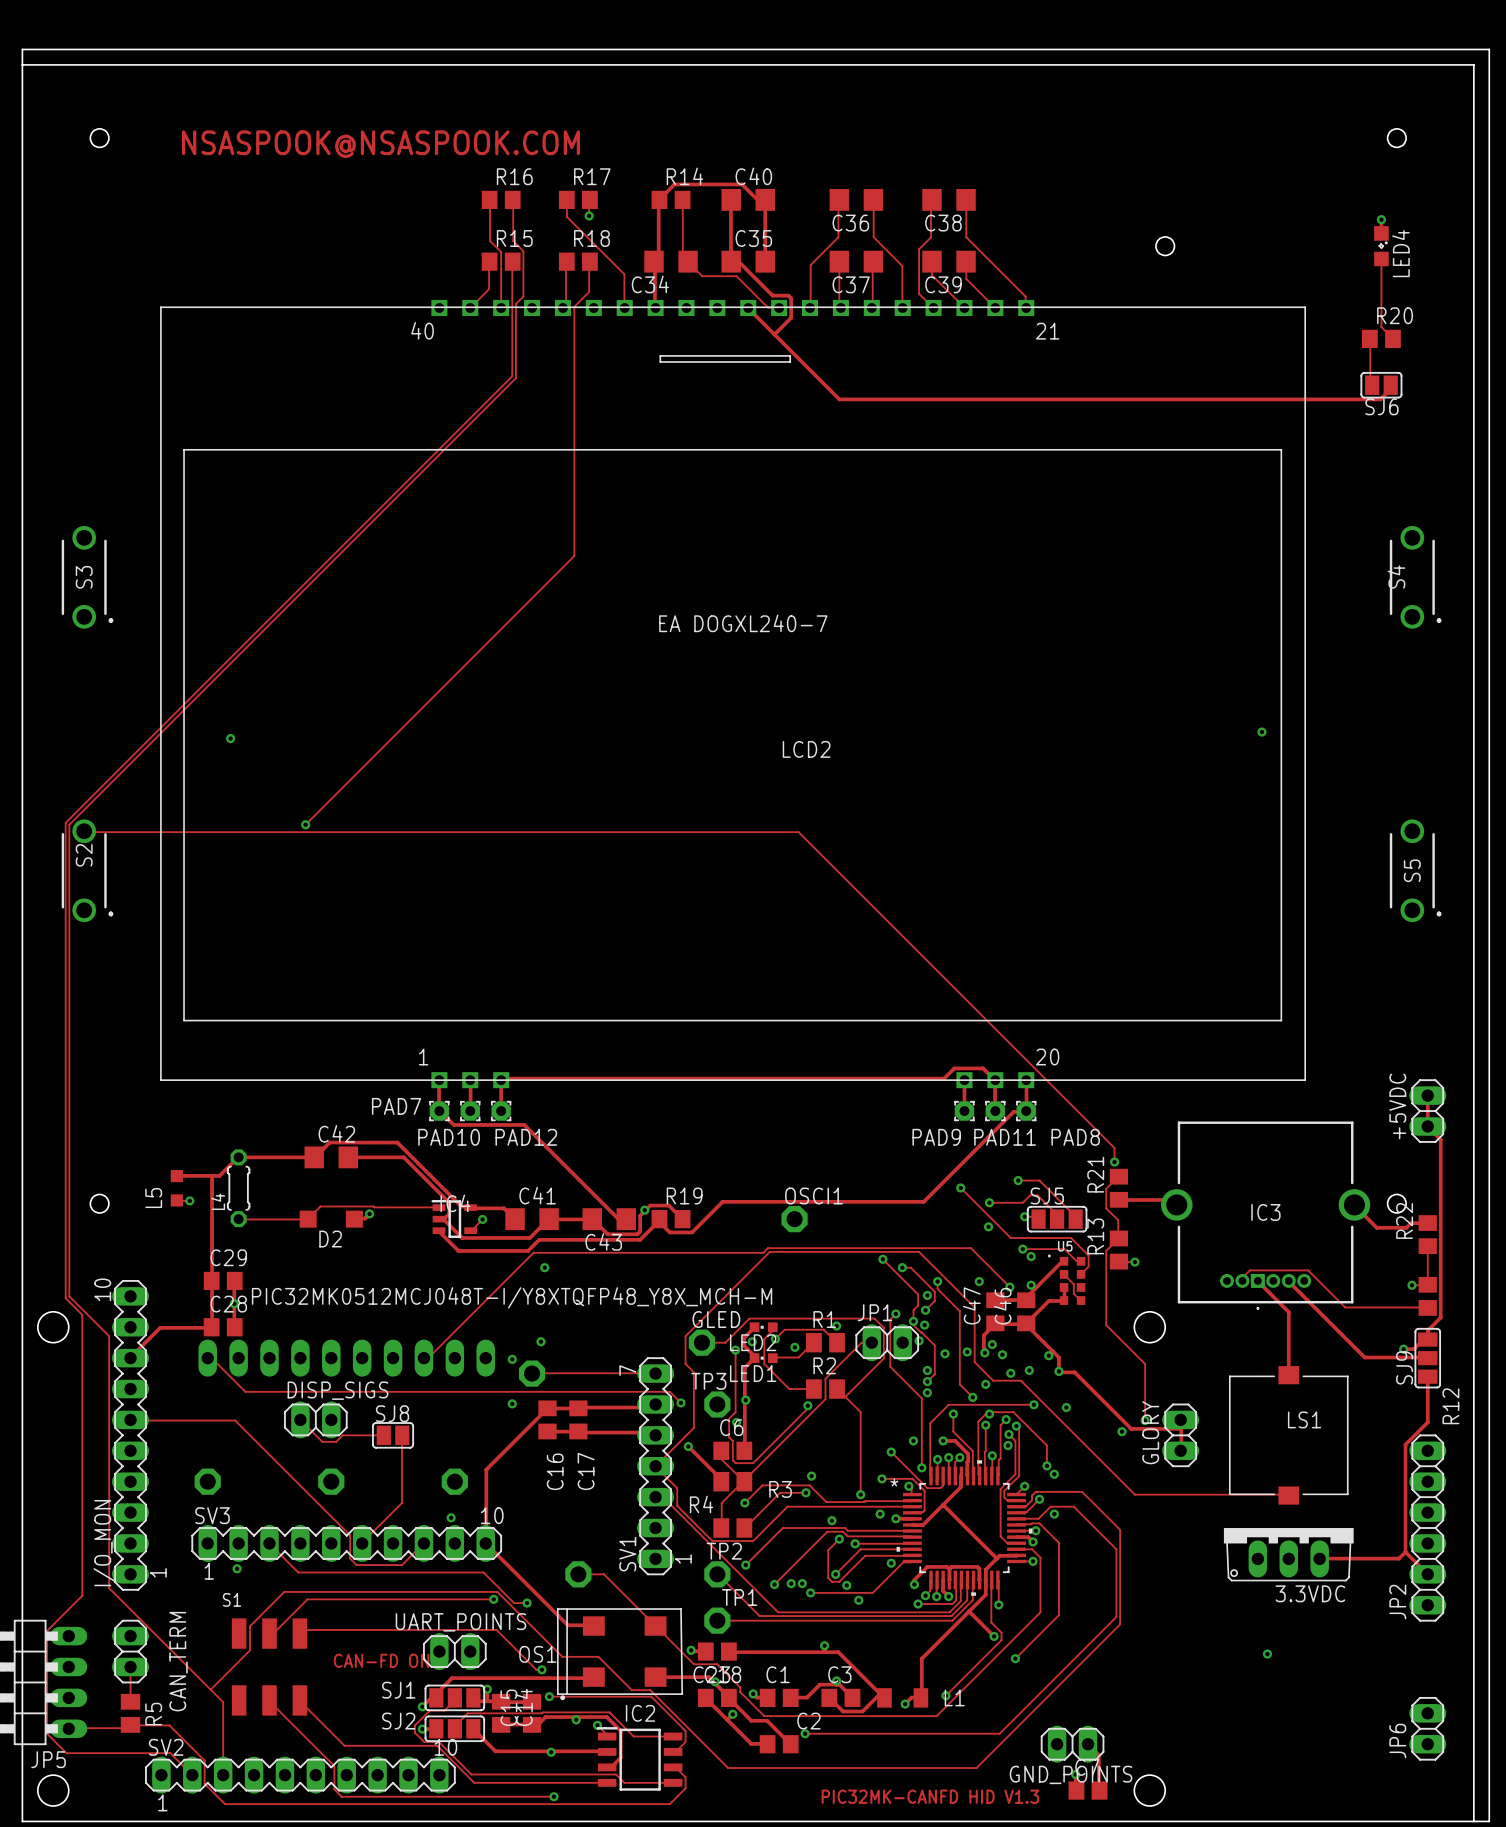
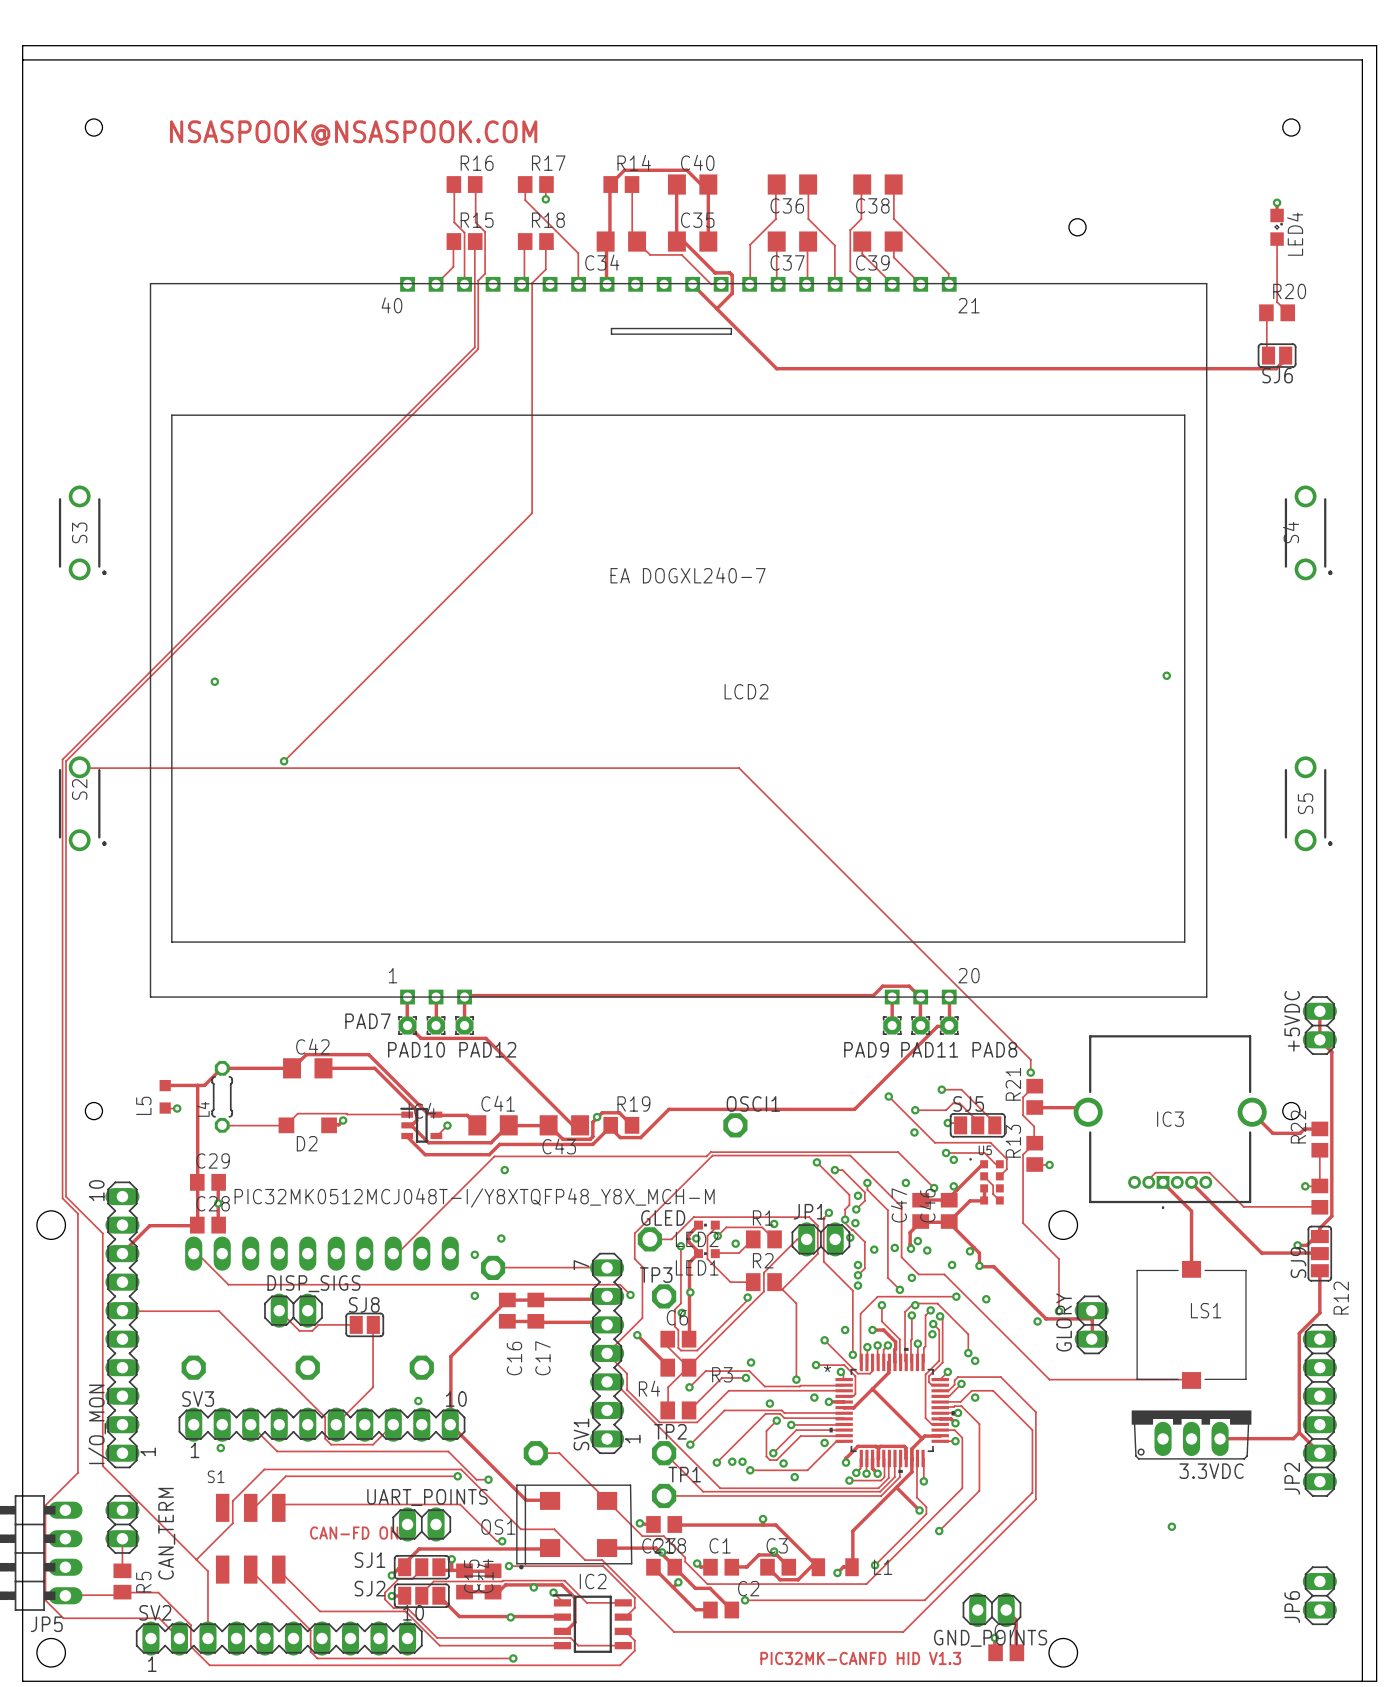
via: (1010, 1373) -> none

